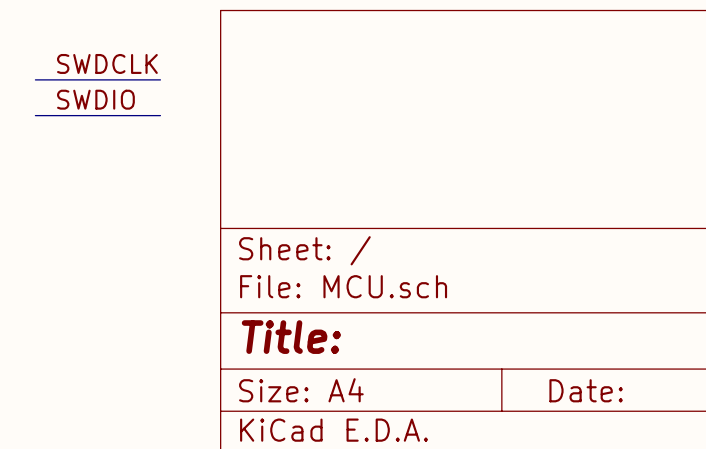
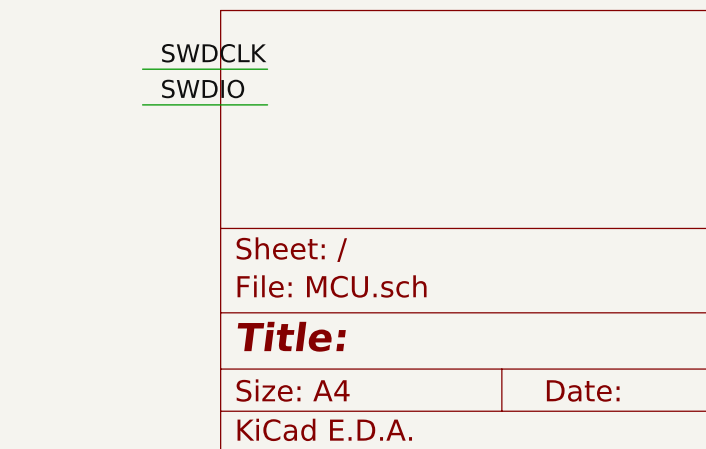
label position: SWDCLK (107, 63) -> SWDCLK (214, 53)
wire: (35, 79) (160, 79) -> (142, 69) (267, 69)
label position: SWDIO (95, 99) -> SWDIO (203, 88)
wire: (35, 115) (160, 115) -> (142, 104) (267, 104)

